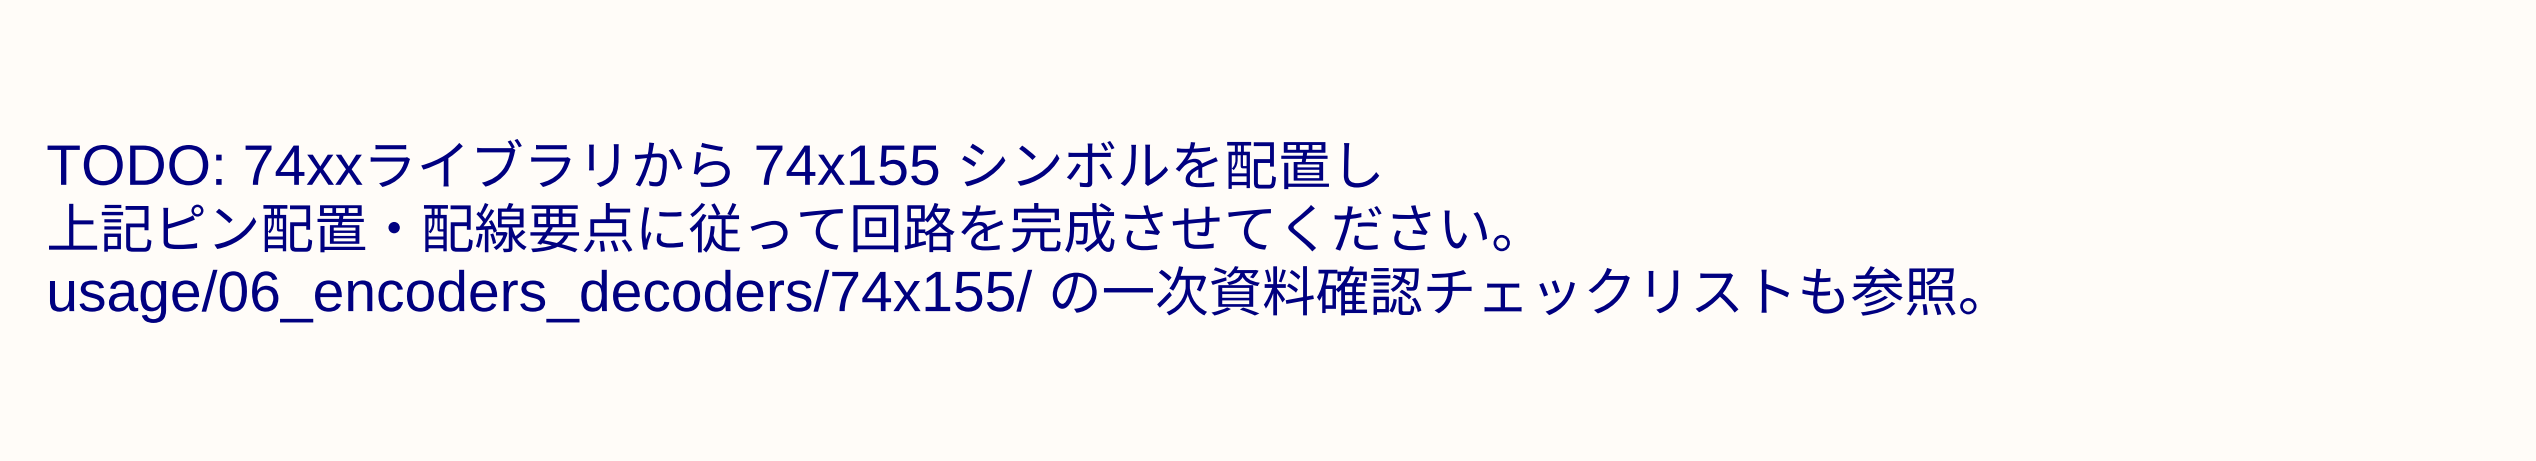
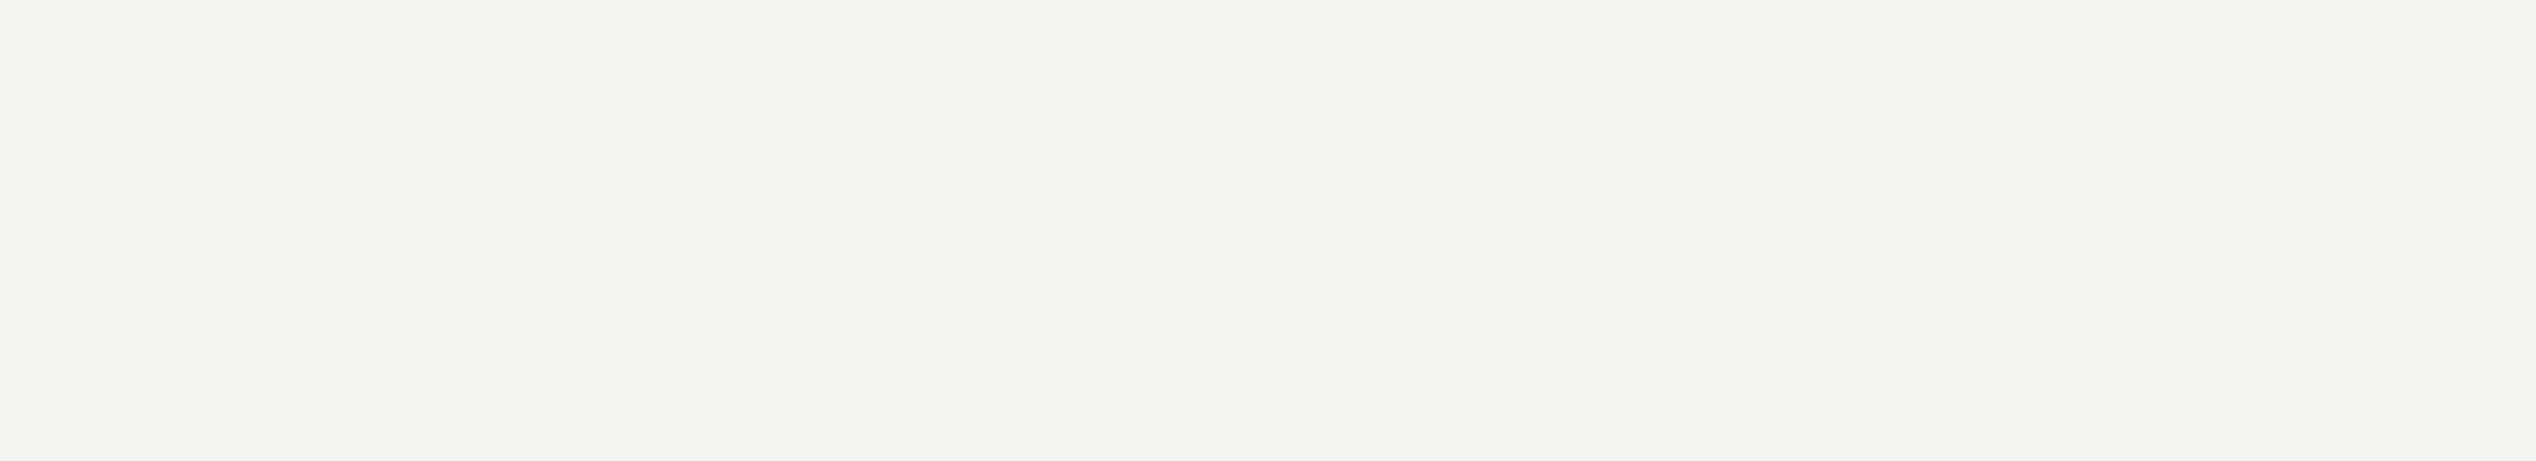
text: TODO: 74xxライブラリから 74x155 シンボルを配置し (713, 164) -> none
text: 上記ピン配置・配線要点に従って回路を完成させてください。 (779, 227) -> none
text: usage/06_encoders_decoders/74x155/ の一次資料確認チェックリストも参照。 (1013, 294) -> none

